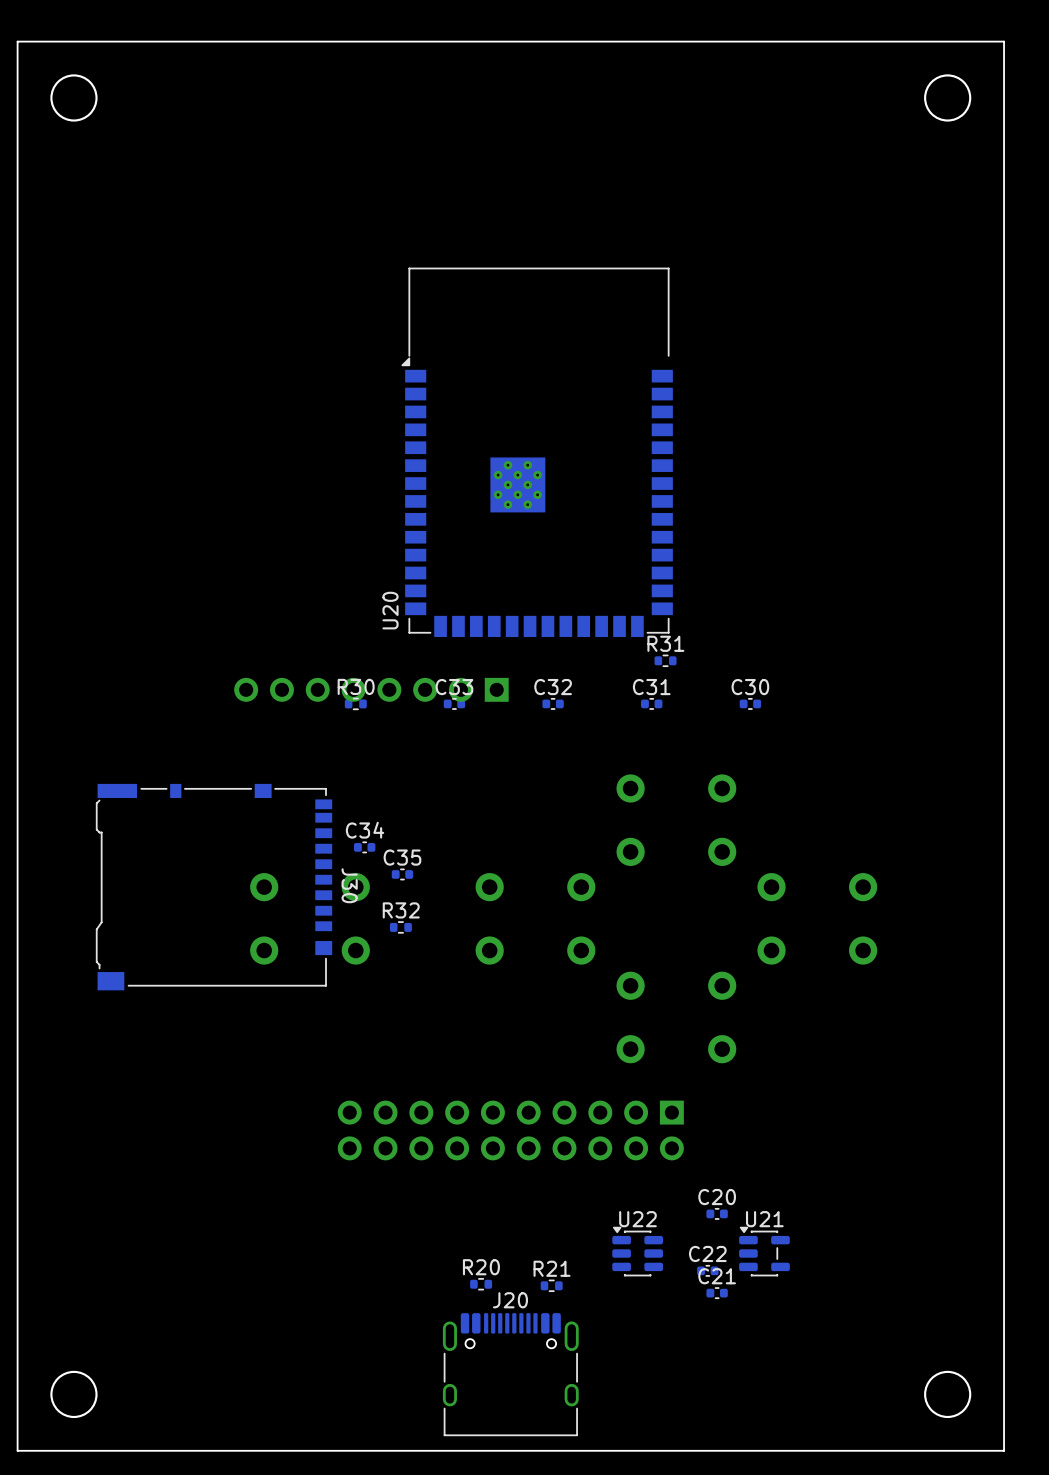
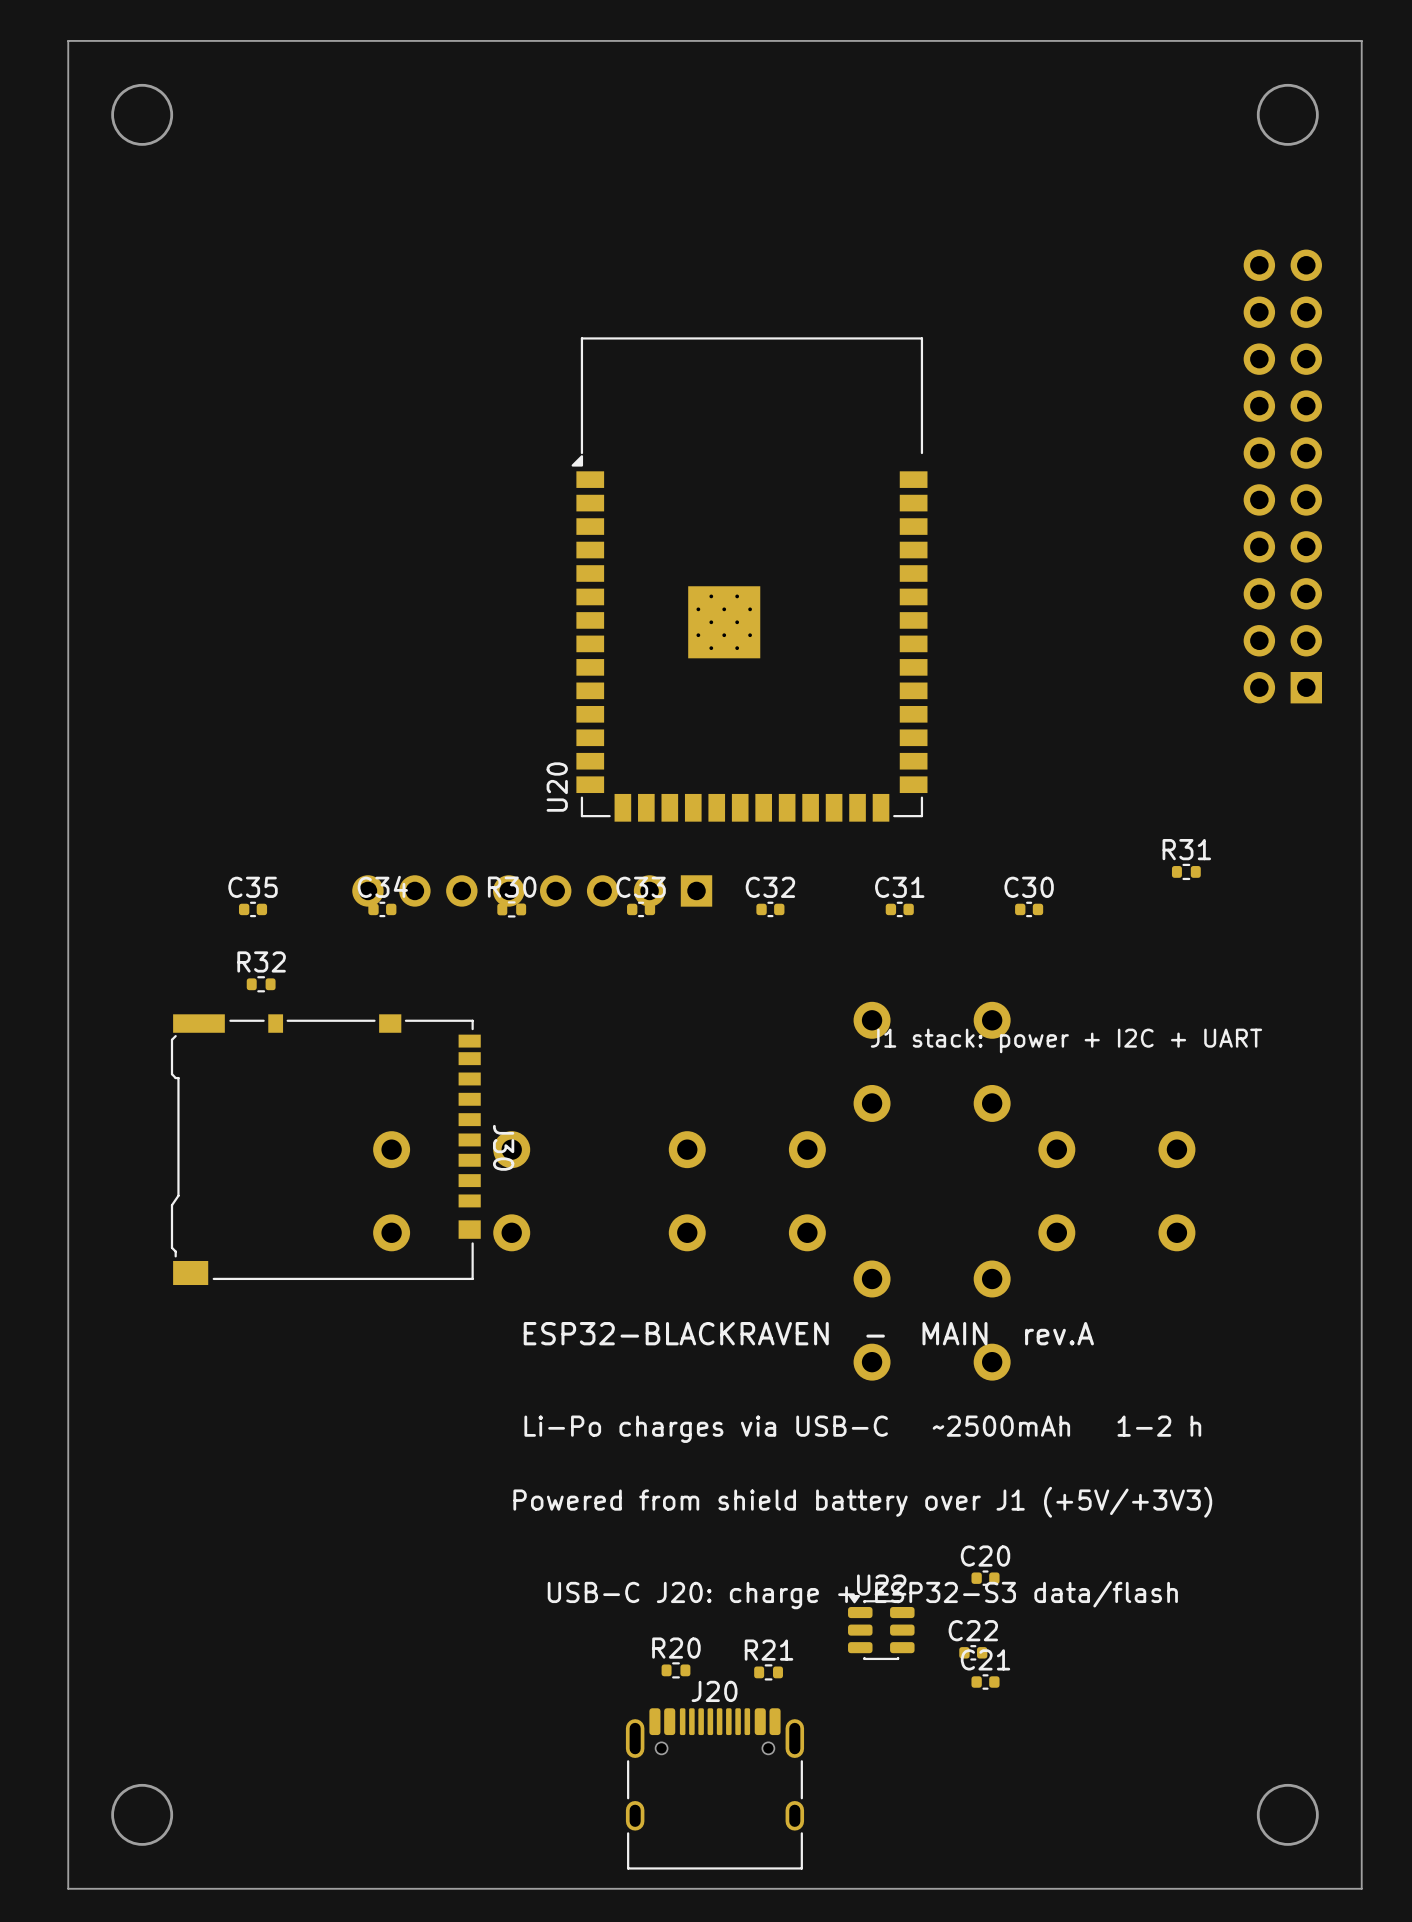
part: none -> (1282, 476)
R31 position: (665, 660) -> (1186, 871)
text: none -> J1 stack: power + I2C + UART (1066, 1040)
C34 position: (364, 847) -> (382, 909)
C35 position: (402, 874) -> (253, 909)
R32 position: (400, 927) -> (261, 984)
text: none -> ESP32-BLACKRAVEN - MAIN rev.A (808, 1333)
text: none -> Li-Po charges via USB-C ~2500mAh 1-2 h (862, 1429)
part: (510, 1130) -> none
text: none -> Powered from shield battery over J1 (+5V/+3V3) (862, 1502)
text: none -> USB-C J20: charge + ESP32-S3 data/flash (862, 1595)
U21: (764, 1251) -> none

